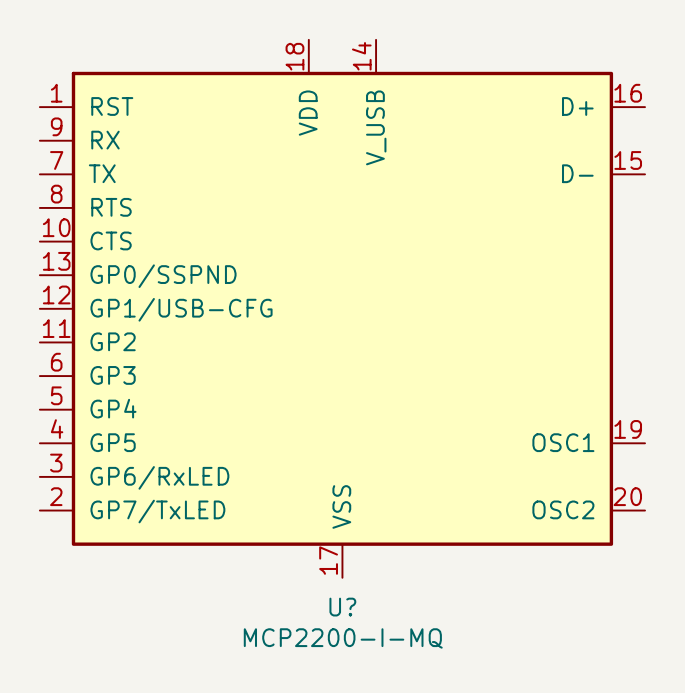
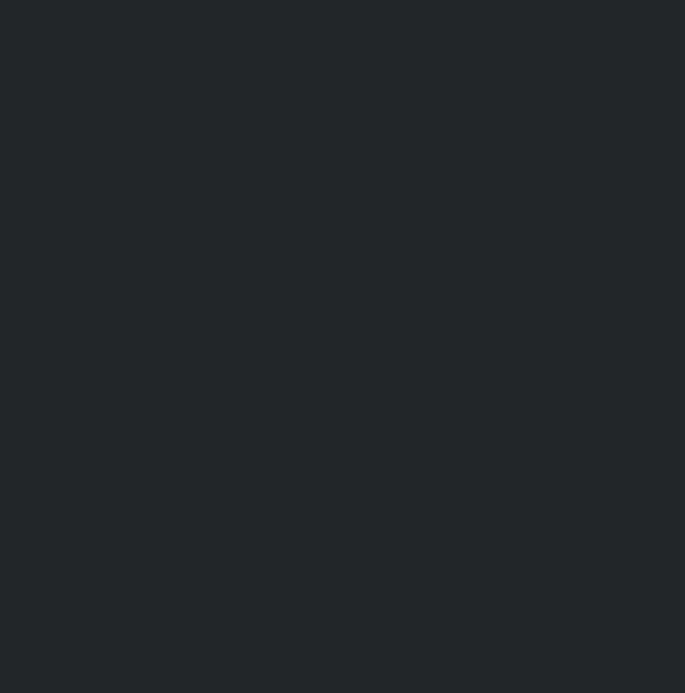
U?: MCP2200-I-MQ (342, 308) -> none

